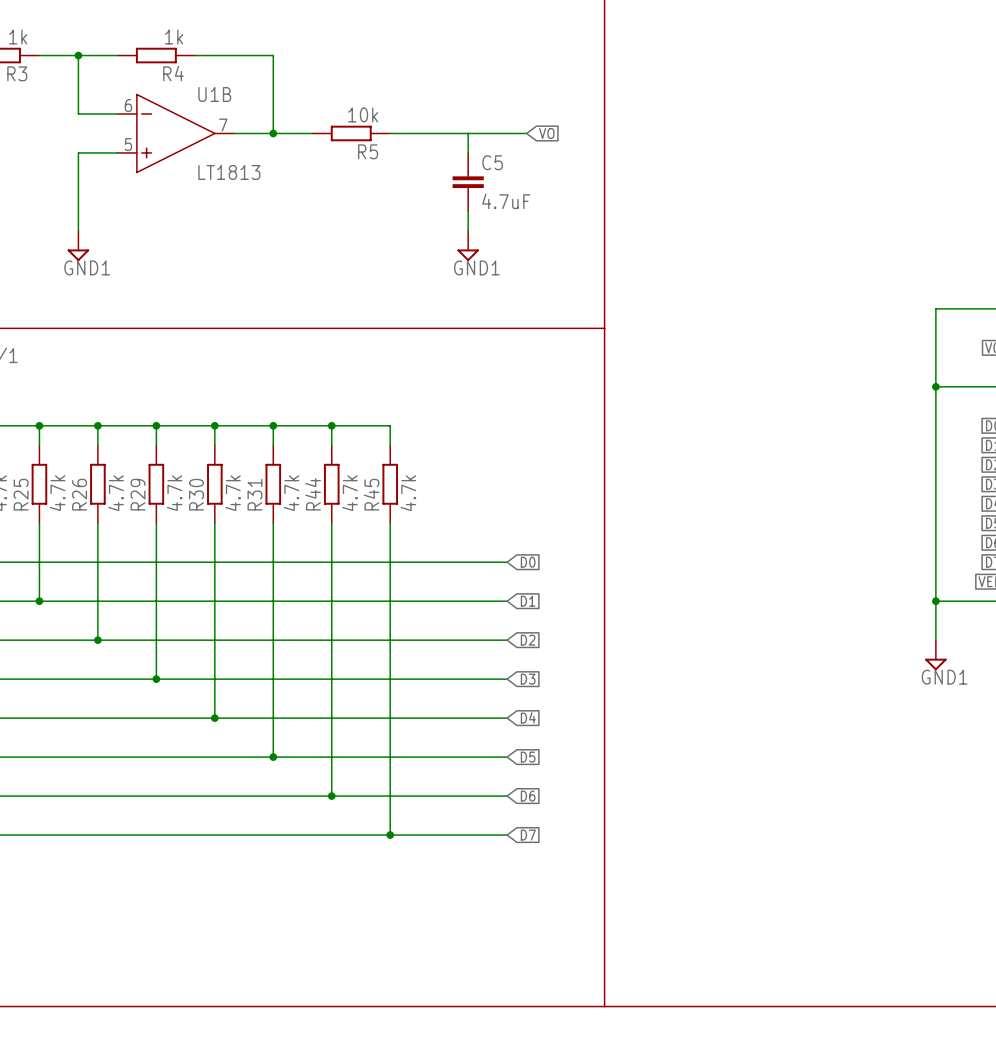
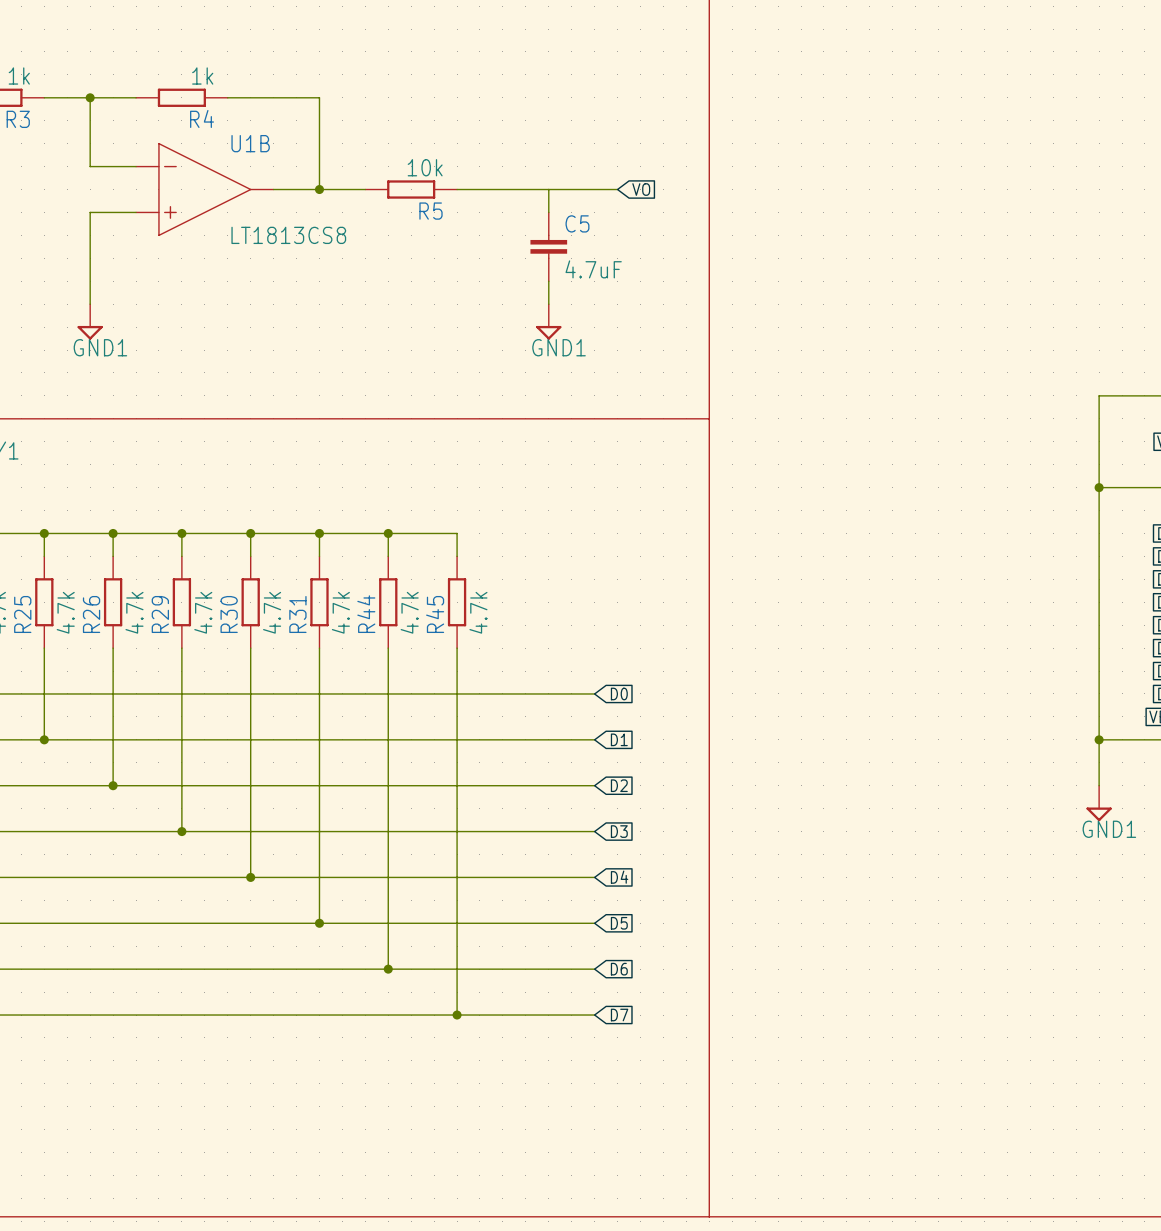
U1B pin number: 6 (128, 105) -> none
U1B pin number: 7 (223, 125) -> none
U1B pin number: 5 (128, 144) -> none
U1B value: LT1813 (229, 172) -> LT1813CS8 (288, 235)

